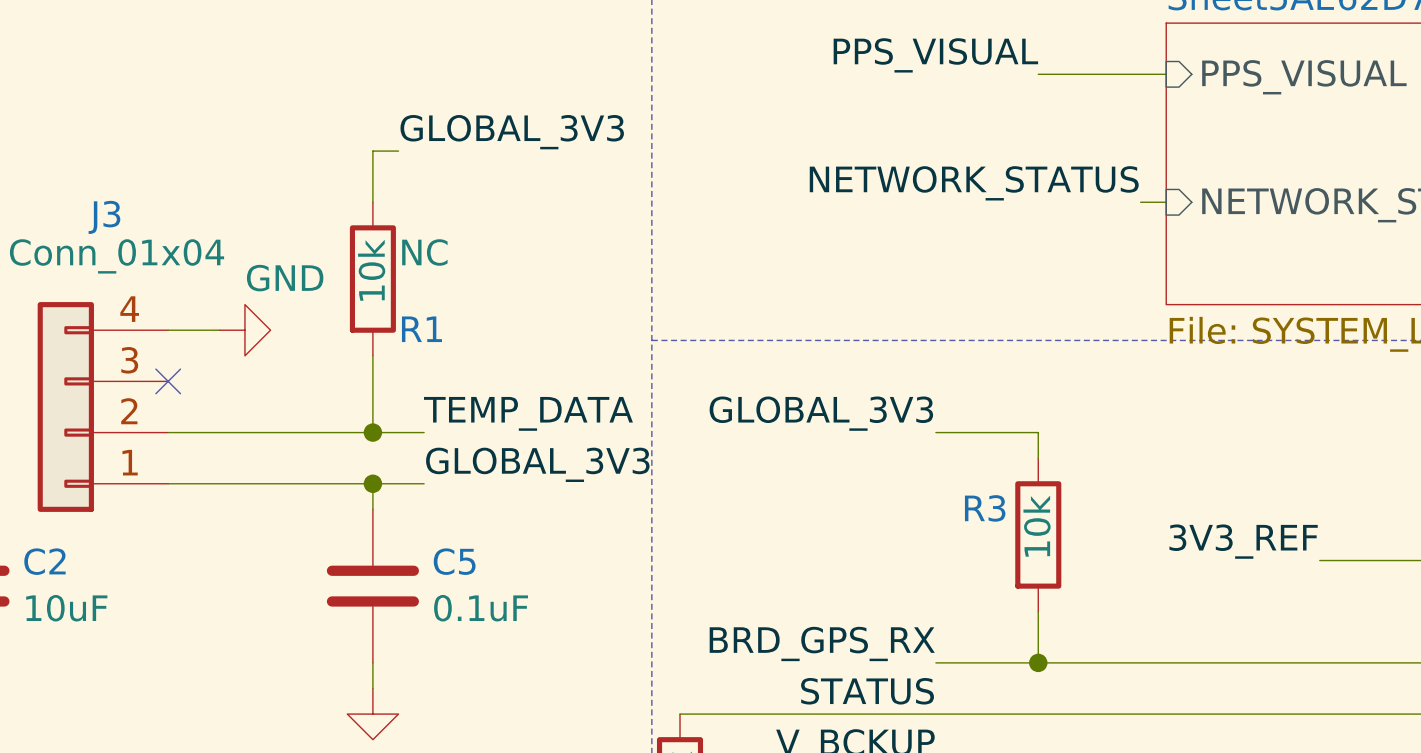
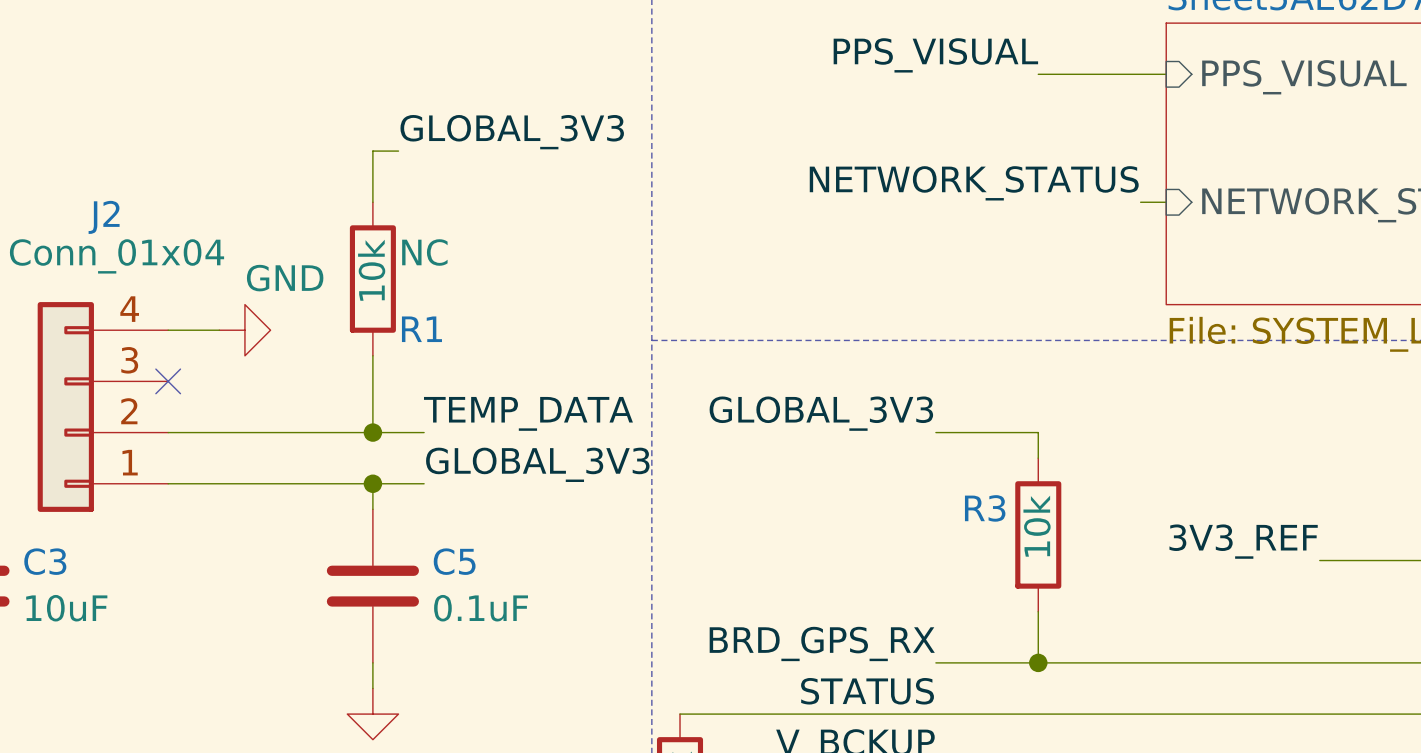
J3 name: J3 (104, 217) -> J2 (104, 217)
C2 name: C2 (44, 561) -> C3 (45, 561)

